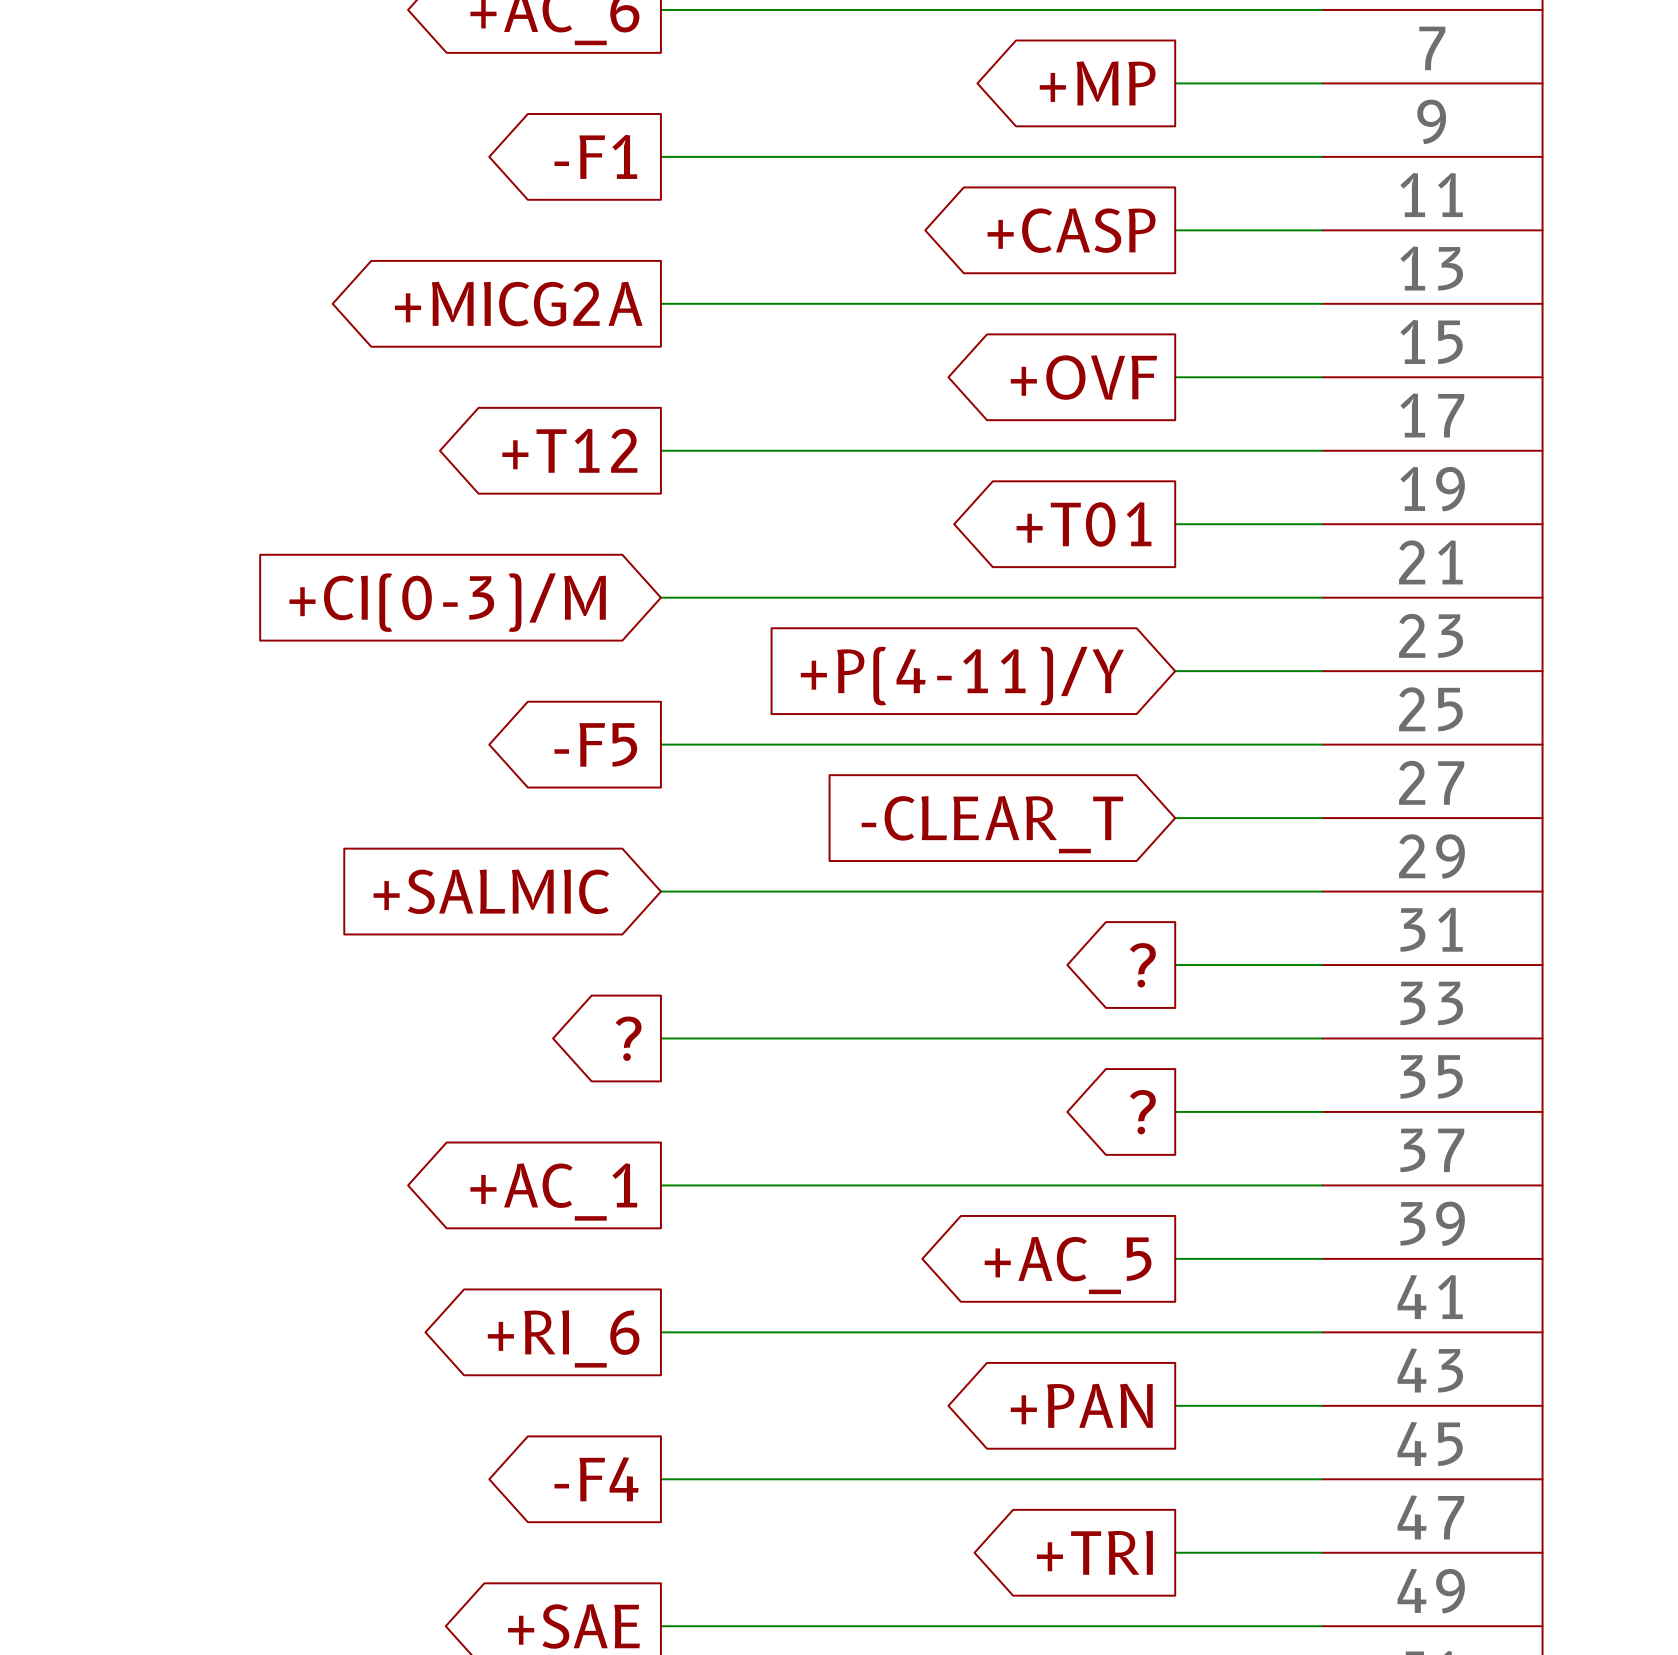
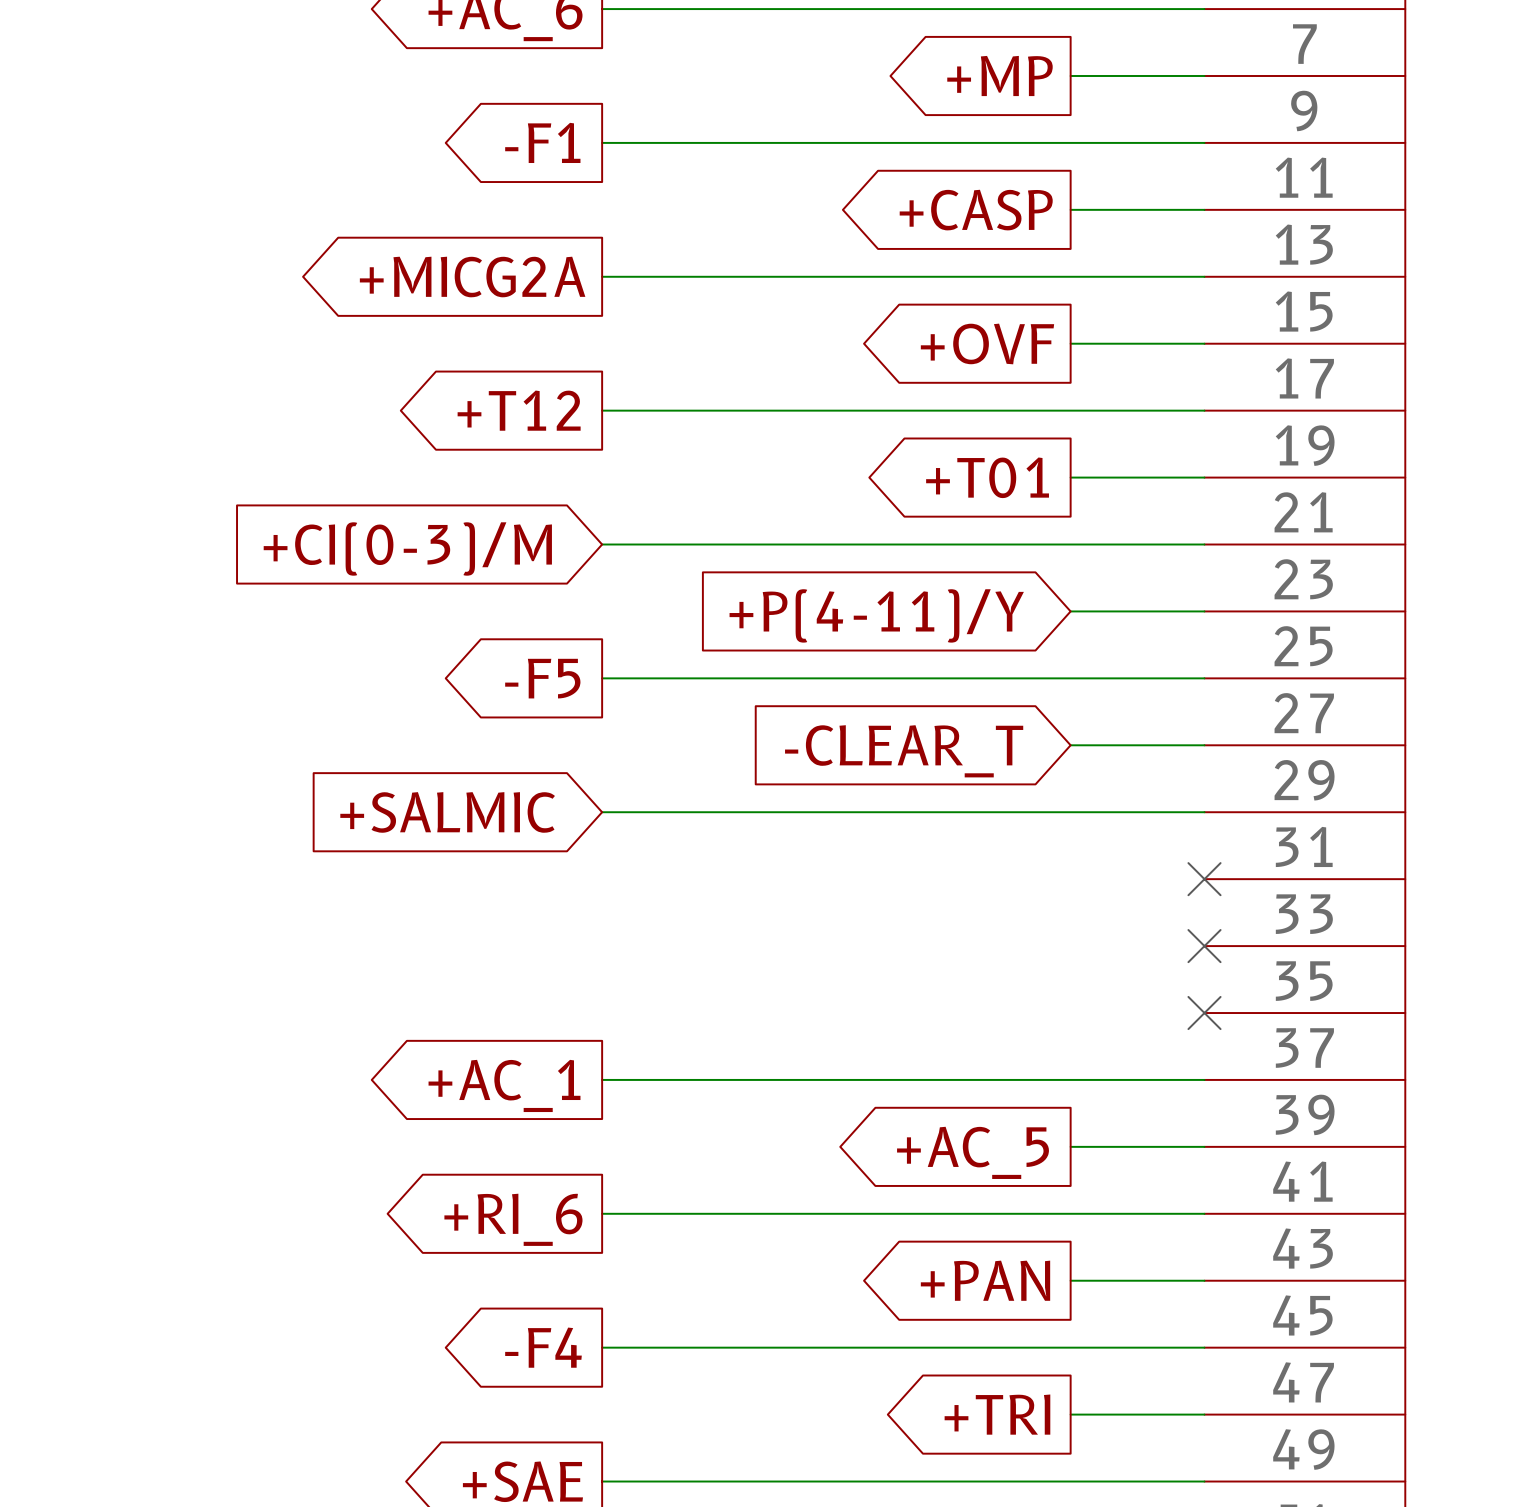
global label: ? (1142, 965) -> none
wire: (1175, 965) (1322, 965) -> none
no-connect mark: none -> (1204, 879)
global label: ? (628, 1038) -> none
wire: (660, 1038) (1322, 1038) -> none
no-connect mark: none -> (1204, 946)
wire: (1175, 1111) (1322, 1111) -> none
no-connect mark: none -> (1204, 1013)
global label: ? (1142, 1112) -> none

